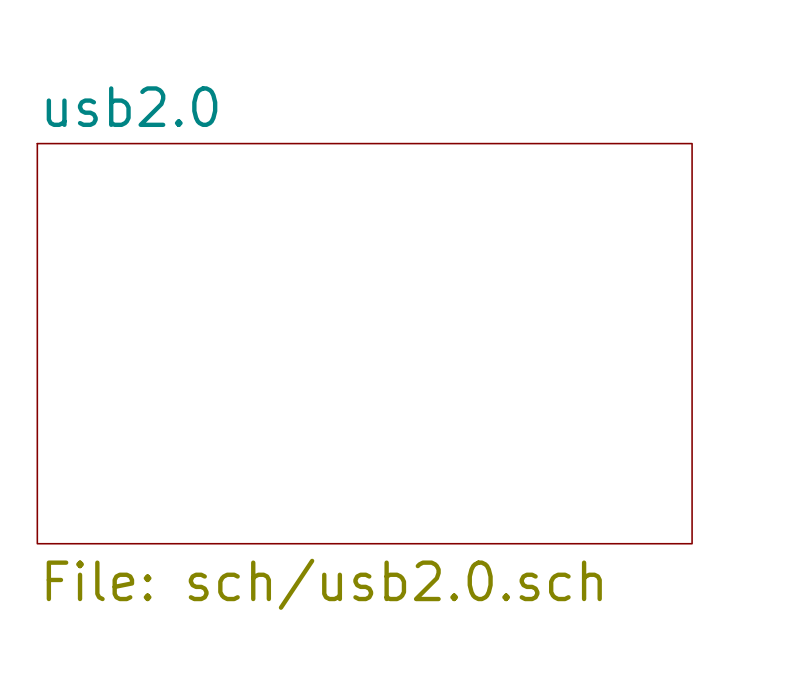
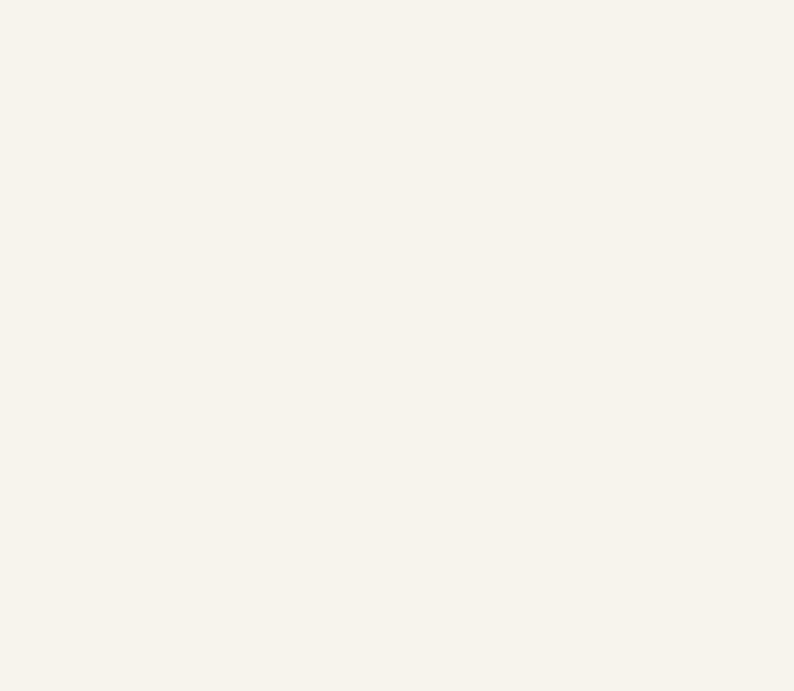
sheet usb2.0: File: sch/usb2.0.sch (364, 343) -> none

